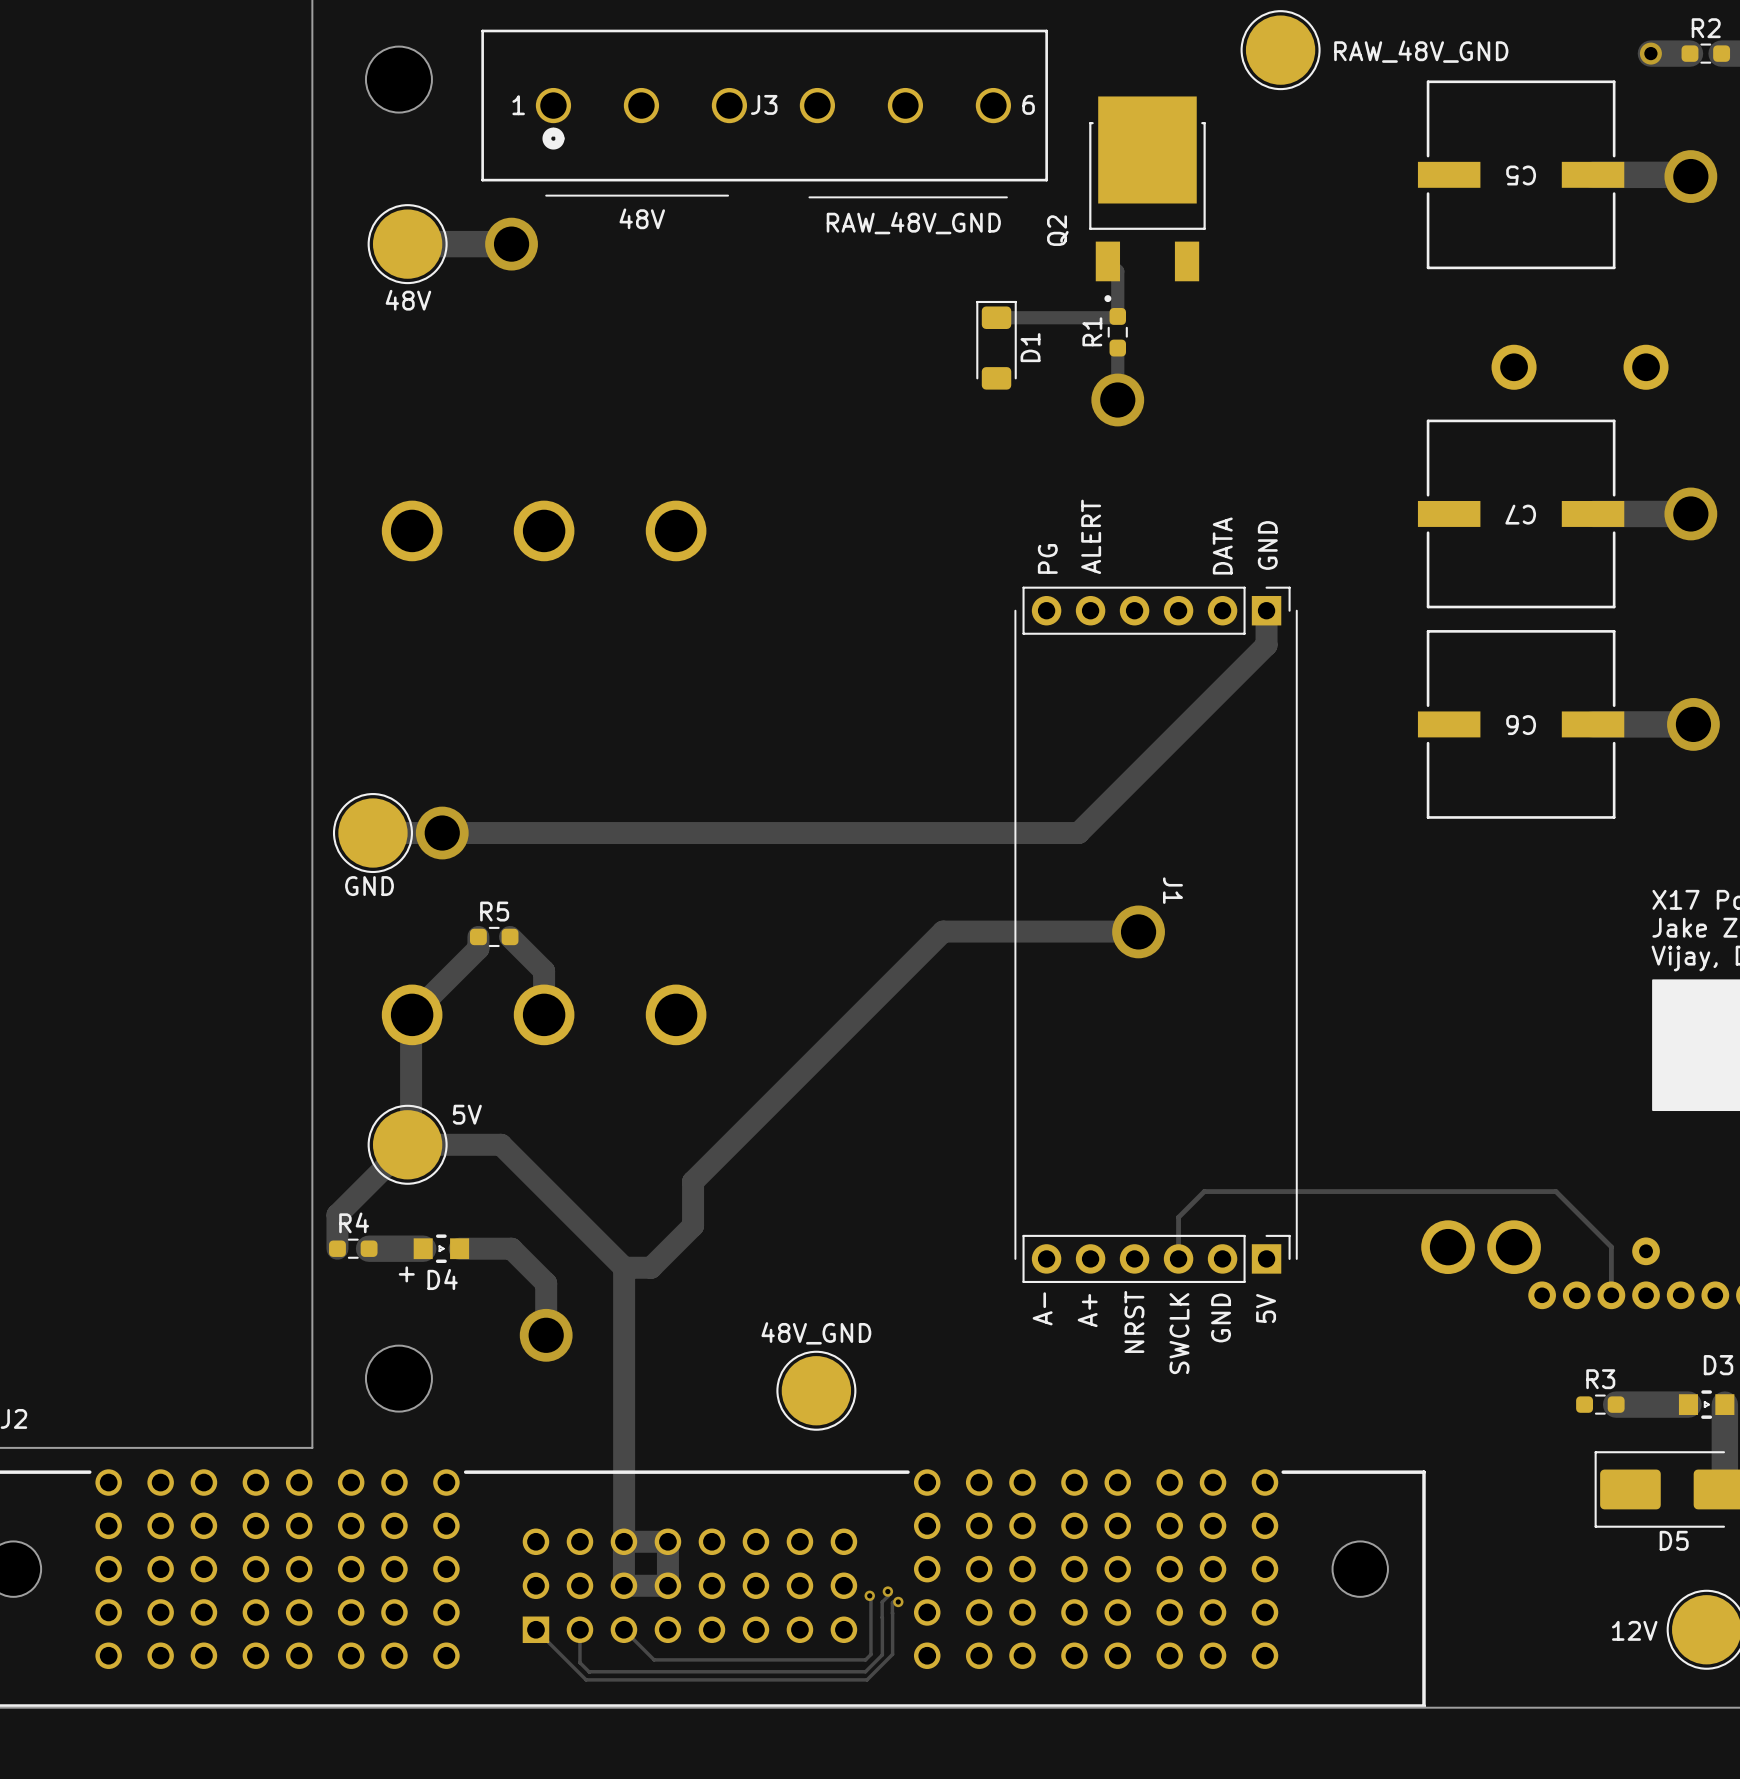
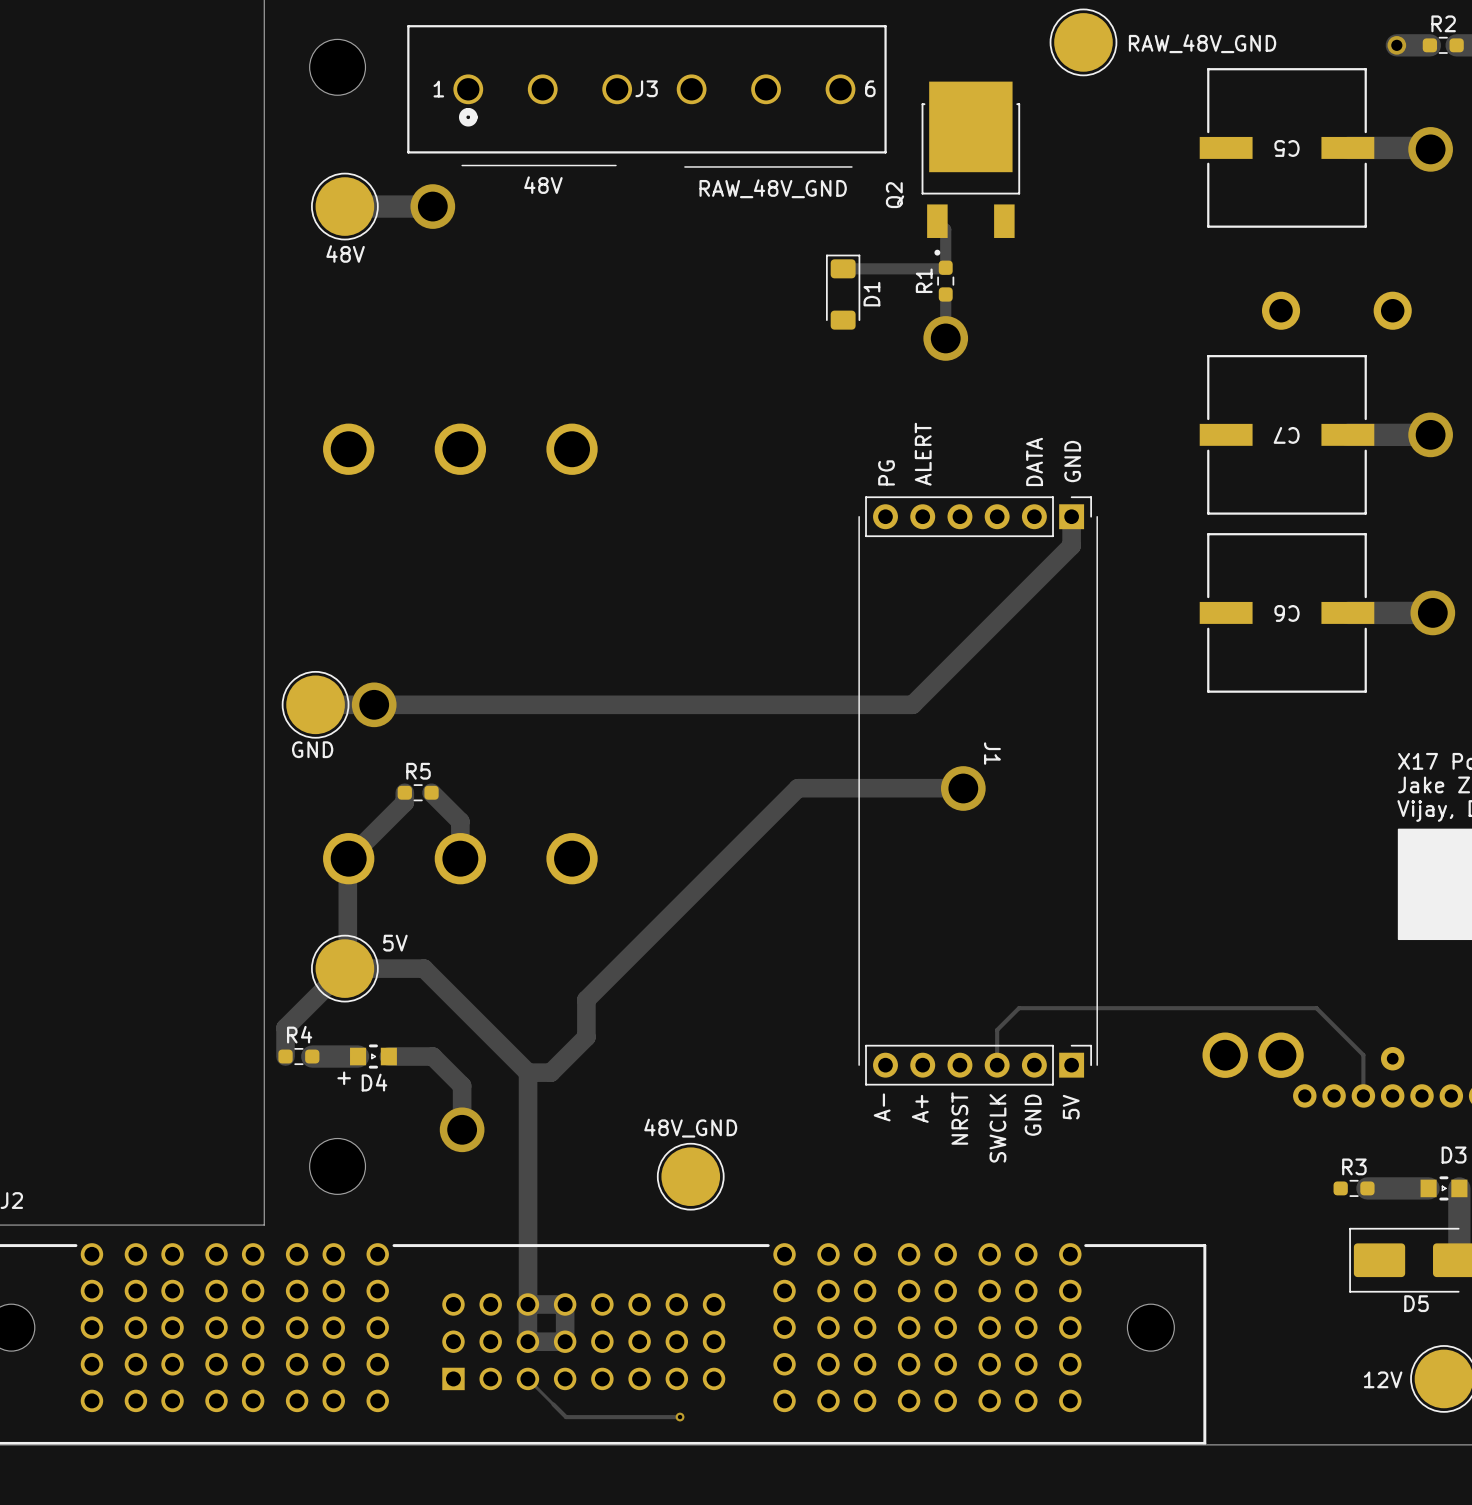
track: (887, 1591) (887, 1596) (882, 1602) (882, 1617) -> none
via: (887, 1591) -> none
track: (869, 1595) (870, 1654) (865, 1659) (654, 1659) -> (679, 1417) (566, 1417) (553, 1404)
via: (869, 1595) -> none
track: (898, 1601) (892, 1602) (892, 1613) -> none
via: (898, 1601) -> none
track: (892, 1613) (892, 1654) (867, 1679) (586, 1679) (535, 1629) -> none
track: (882, 1617) (882, 1654) (865, 1671) (589, 1672) (579, 1662) (579, 1629) -> none
via: none -> (680, 1417)

